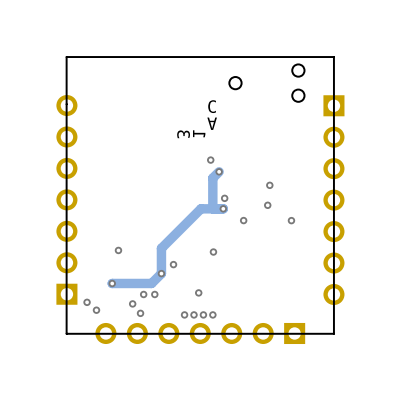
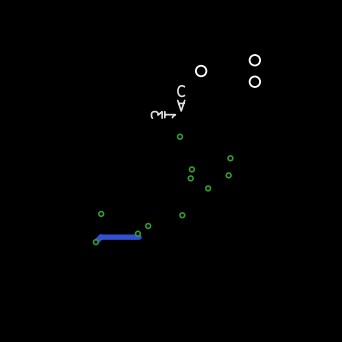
board edge: (333, 57) (66, 57) (66, 333) (333, 333) (333, 57) -> none
track: (219, 171) (212, 178) (212, 208) -> none
via: (219, 171) -> none
part: (66, 199) -> none
part: (333, 200) -> none
track: (223, 208) (200, 208) (161, 248) (161, 273) (151, 283) (112, 283) -> (139, 237) (100, 237) (95, 242)
via: (291, 220) -> none
via: (198, 292) -> none
via: (143, 294) -> none
via: (154, 294) -> none
via: (87, 302) -> none
via: (132, 303) -> none
via: (96, 310) -> none
via: (140, 313) -> none
via: (184, 314) -> none
via: (193, 314) -> none
via: (203, 314) -> none
via: (212, 314) -> none
part: (200, 333) -> none

